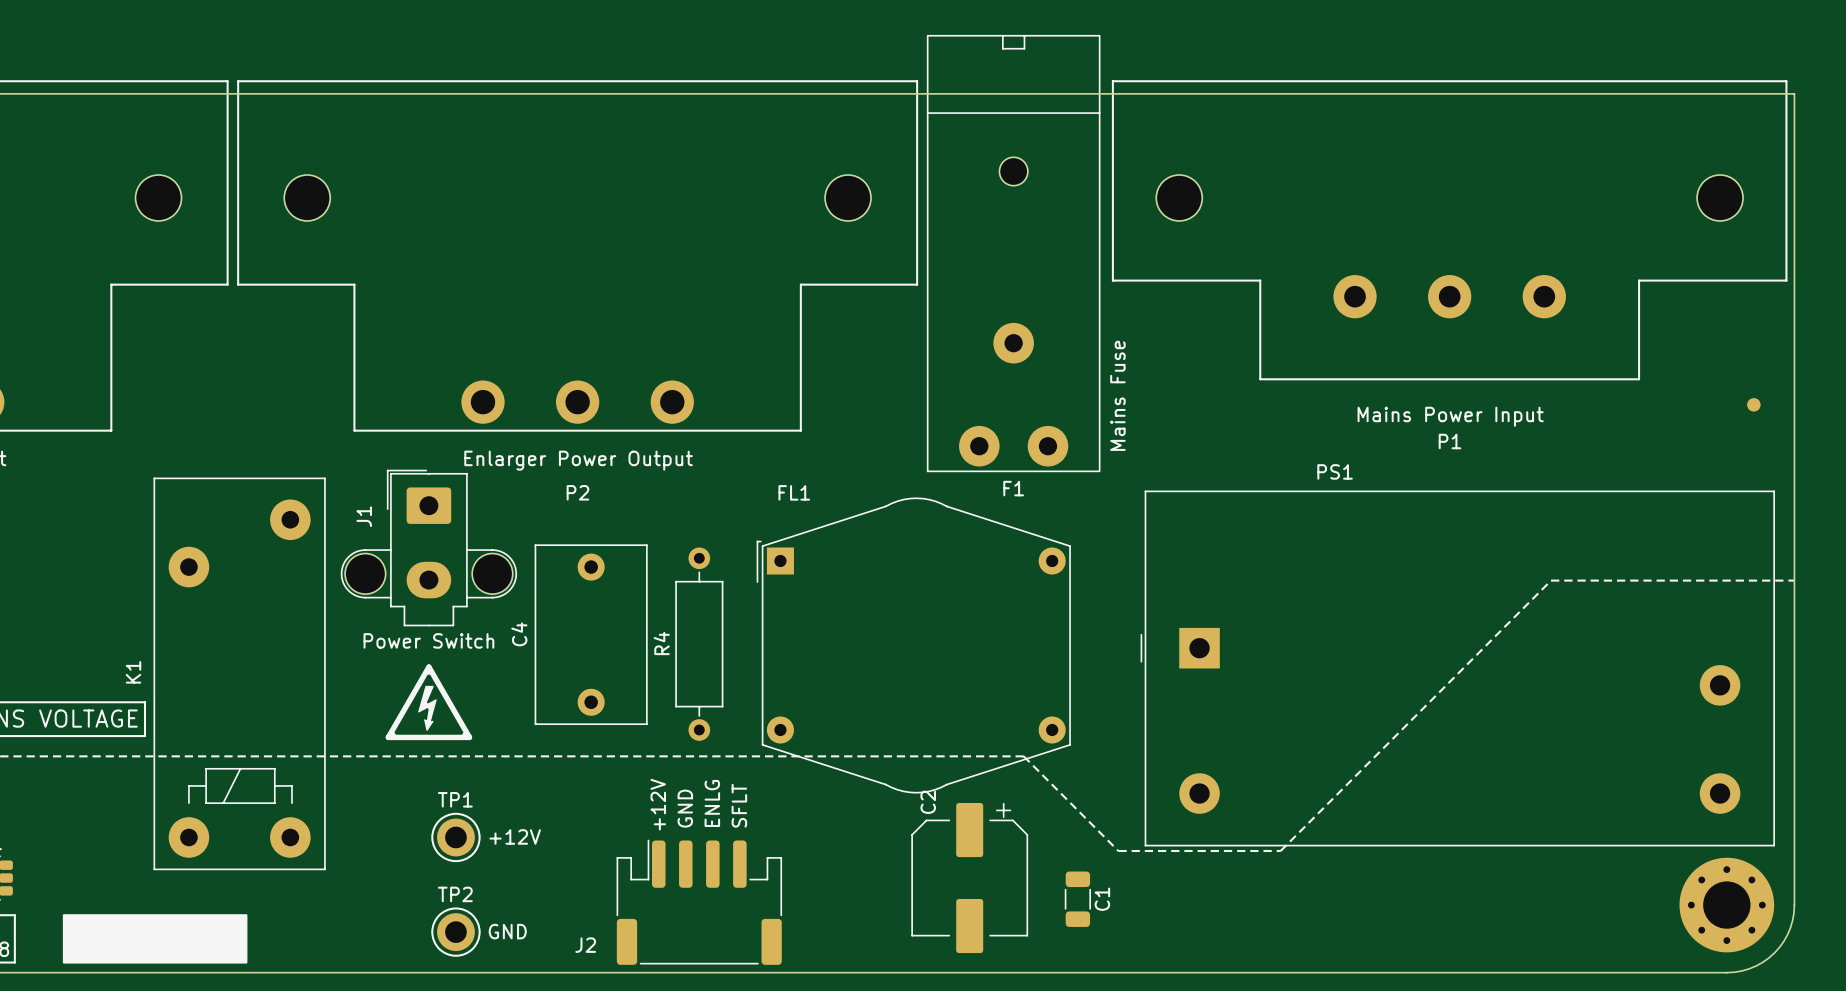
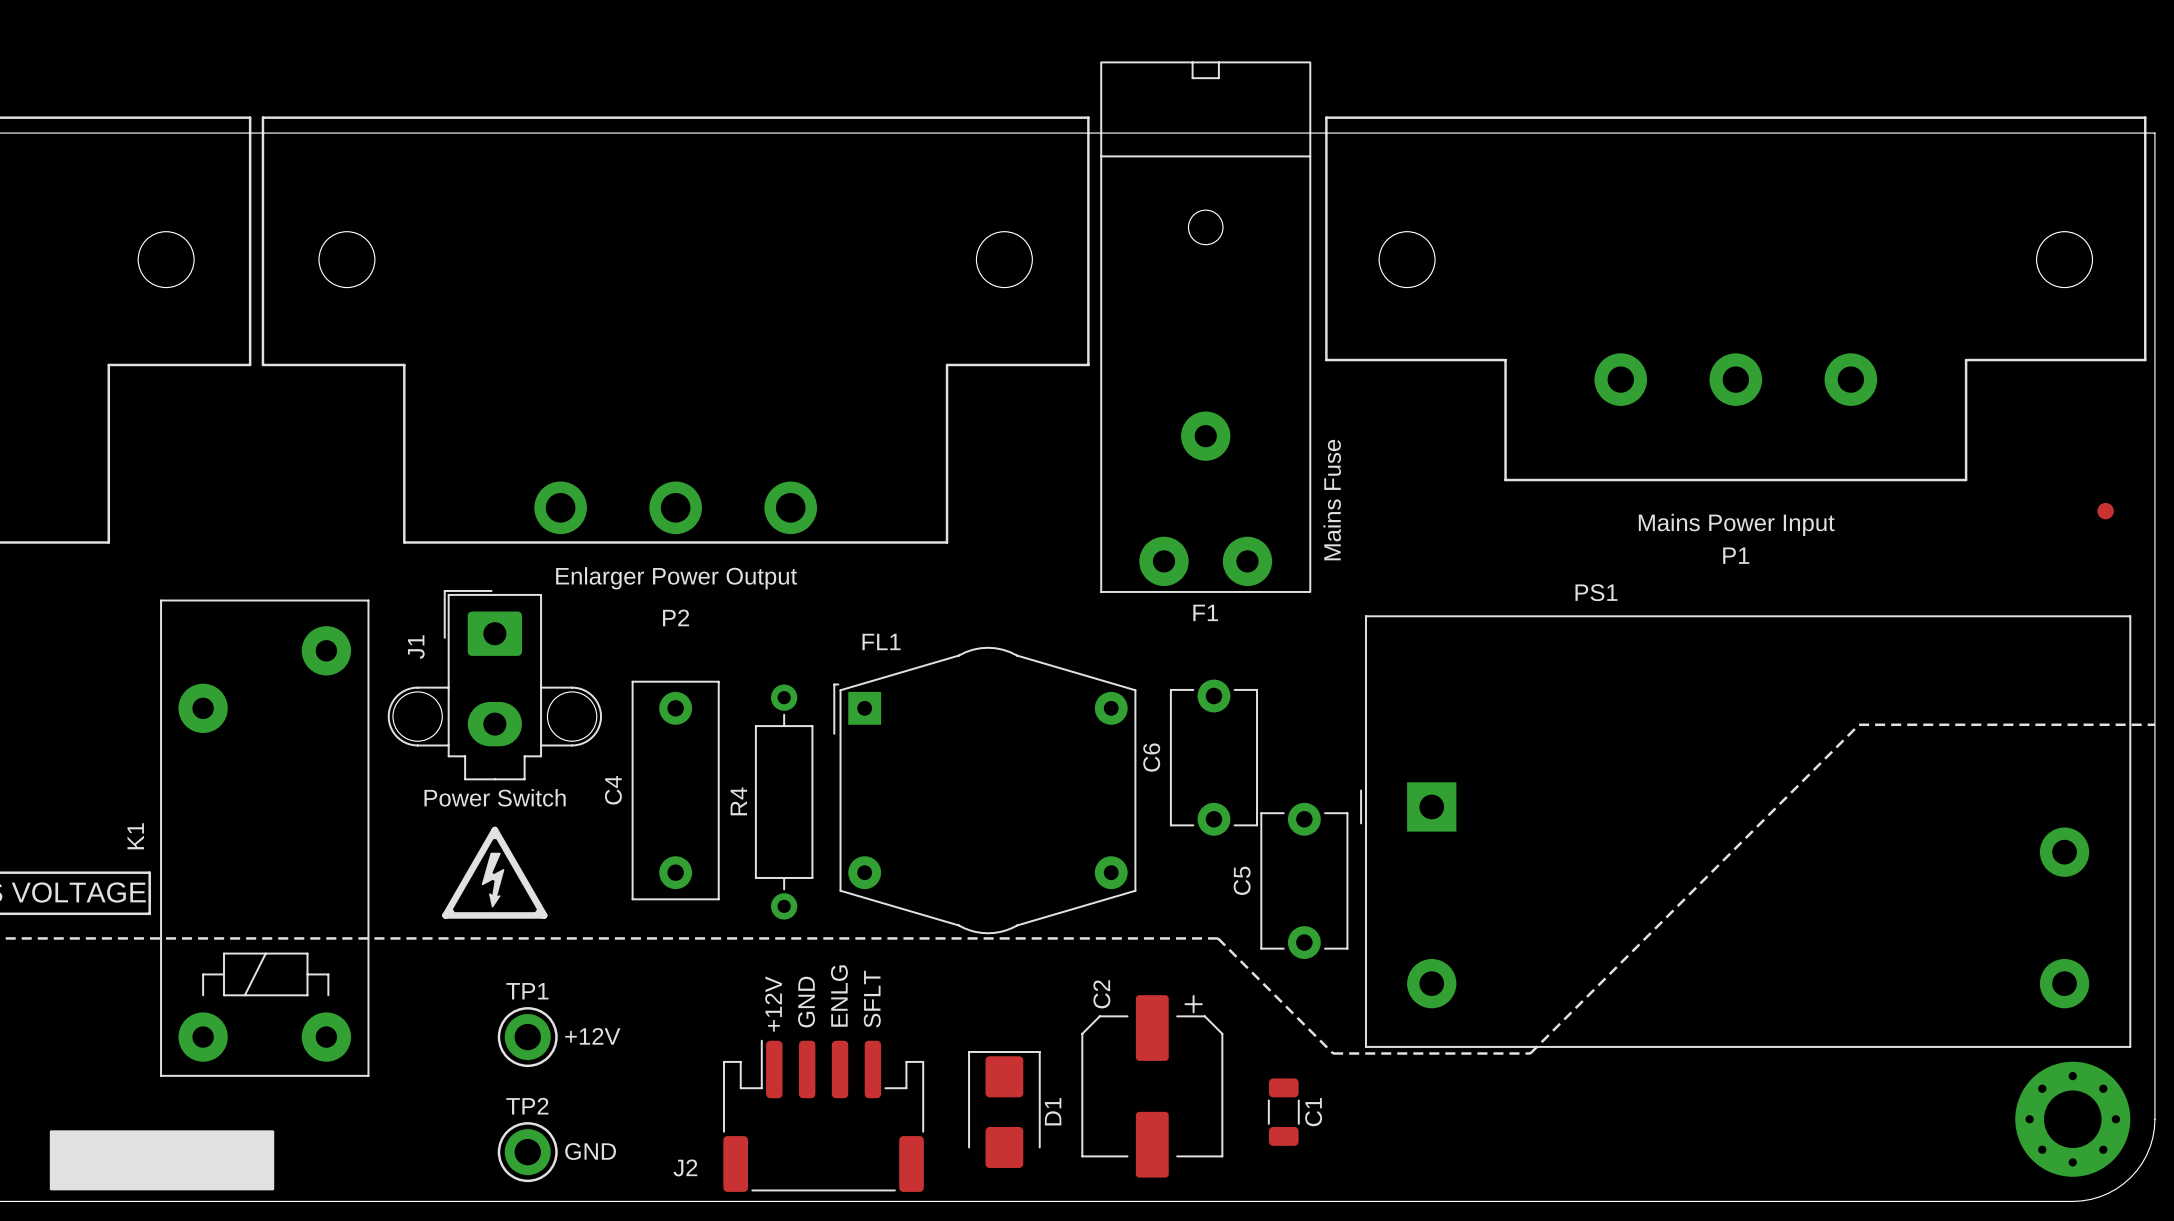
FL1 name position: FL1 (794, 492) -> FL1 (881, 641)
FL1 footprint: [756, 497, 1071, 794] -> [833, 646, 1137, 935]
C4 footprint: [534, 544, 648, 725] -> [631, 680, 720, 901]
C6: none -> (1213, 757)
R4 position: (699, 644) -> (784, 802)
C5: none -> (1304, 880)
D1: none -> (1004, 1109)

